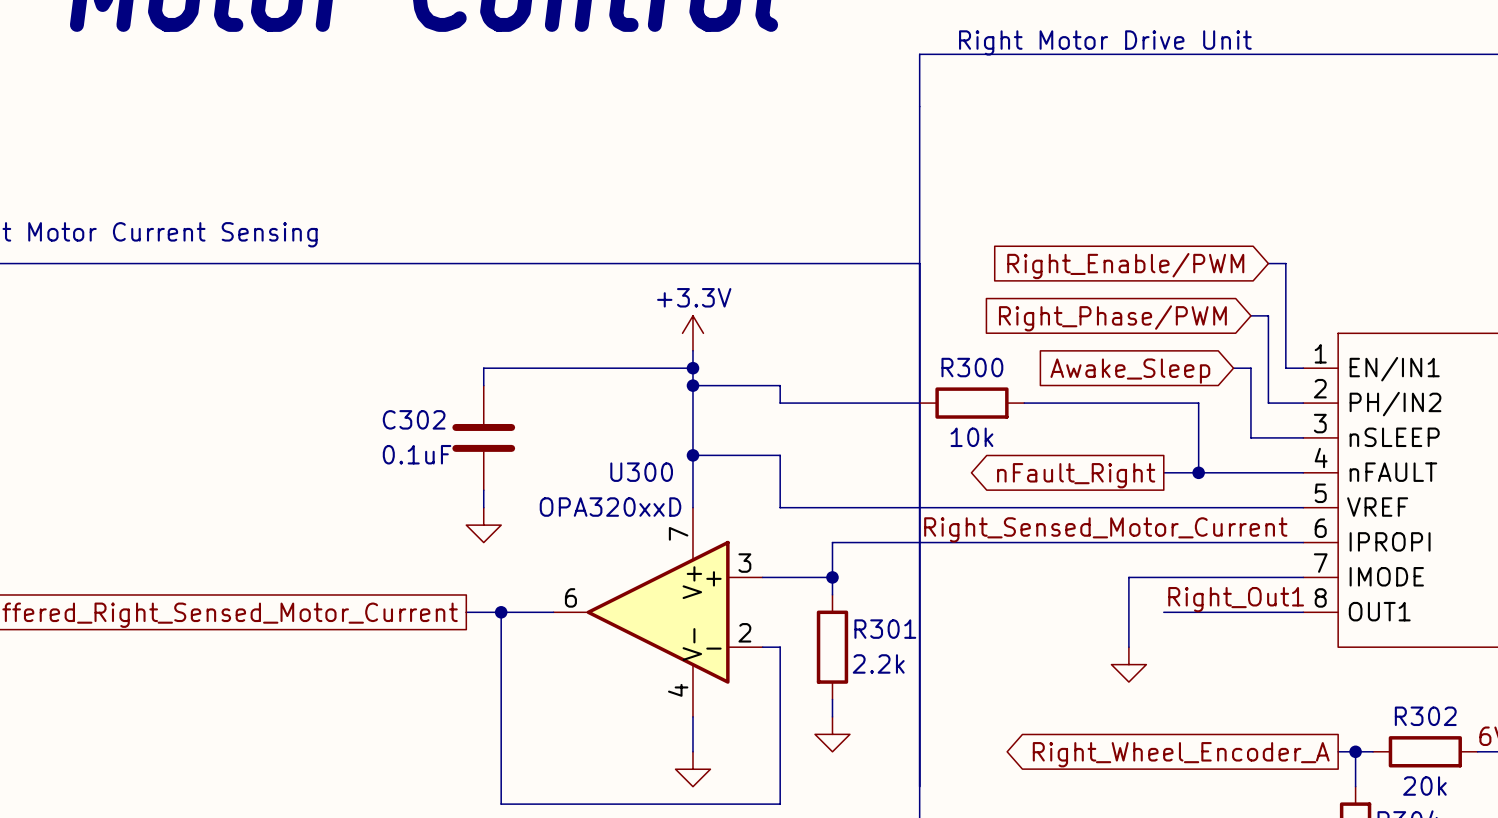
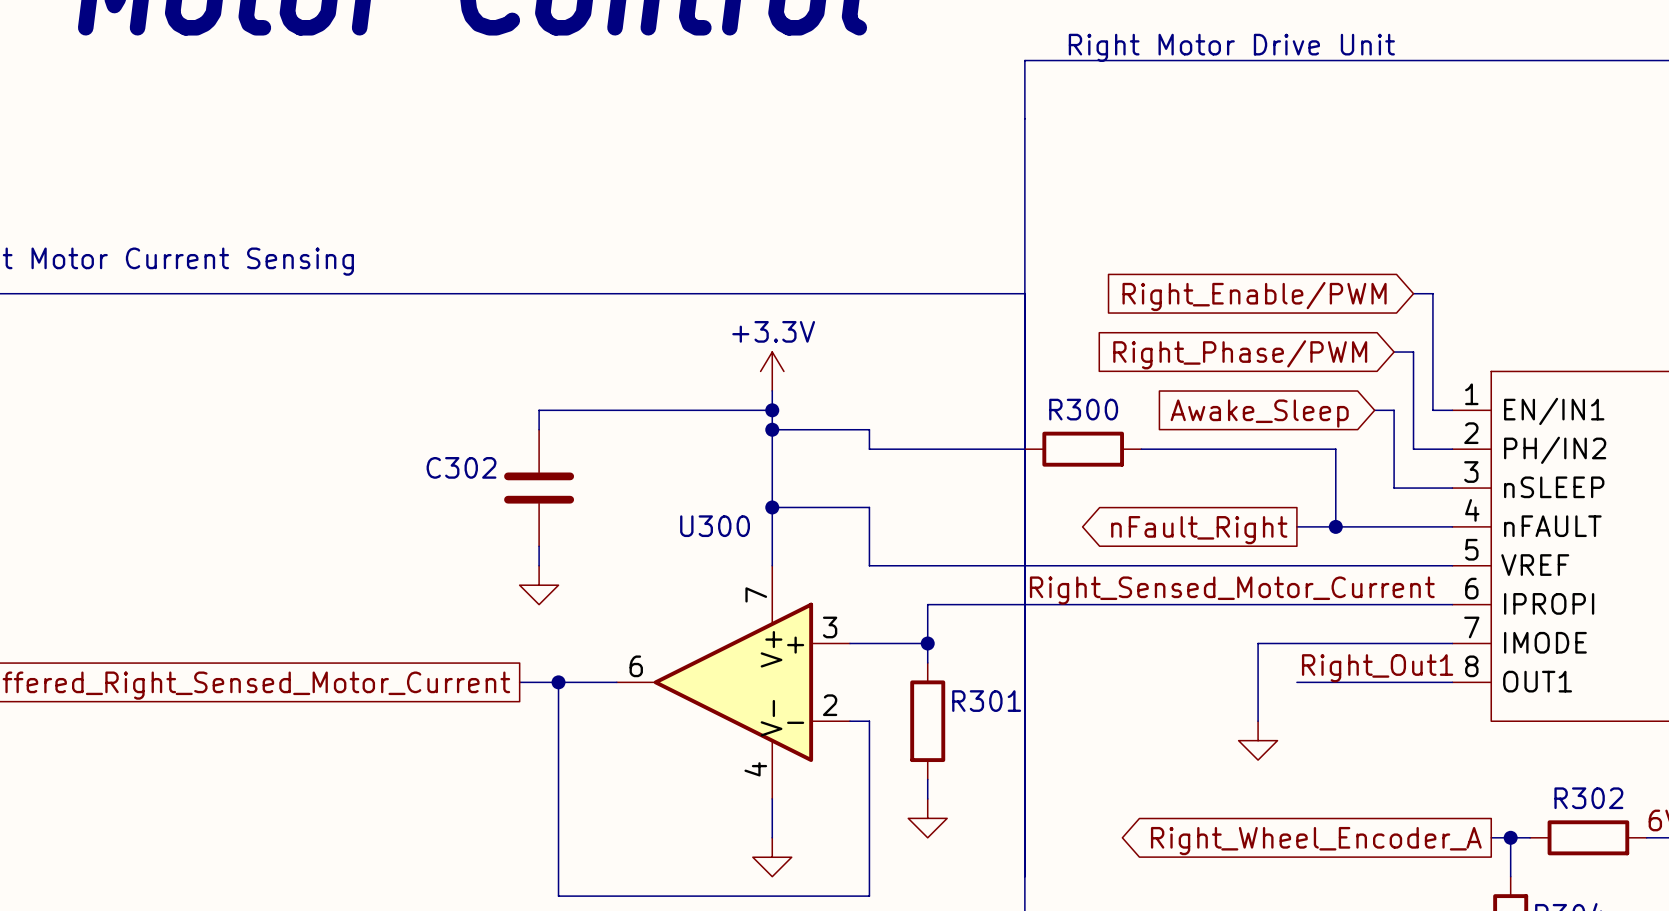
R300 value: 10k (971, 437) -> none
C302 value: 0.1uF (417, 454) -> none
U300 value: OPA320xxD (610, 507) -> none
R301 value: 2.2k (878, 663) -> none
R302 value: 20k (1424, 786) -> none

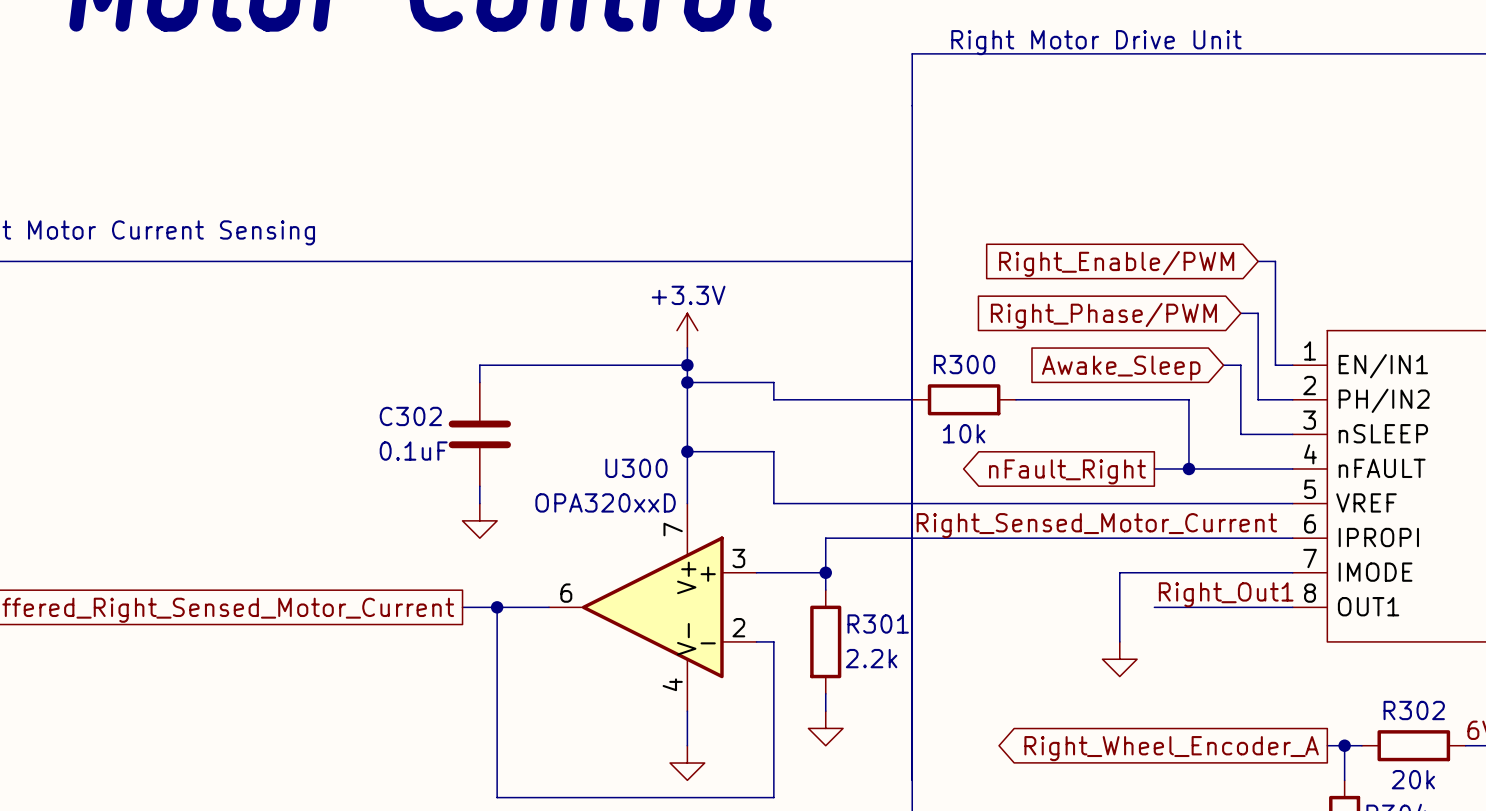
R300 value: none -> 10k (964, 433)
C302 value: none -> 0.1uF (413, 451)
U300 value: none -> OPA320xxD (605, 502)
R301 value: none -> 2.2k (871, 658)
R302 value: none -> 20k (1413, 779)

